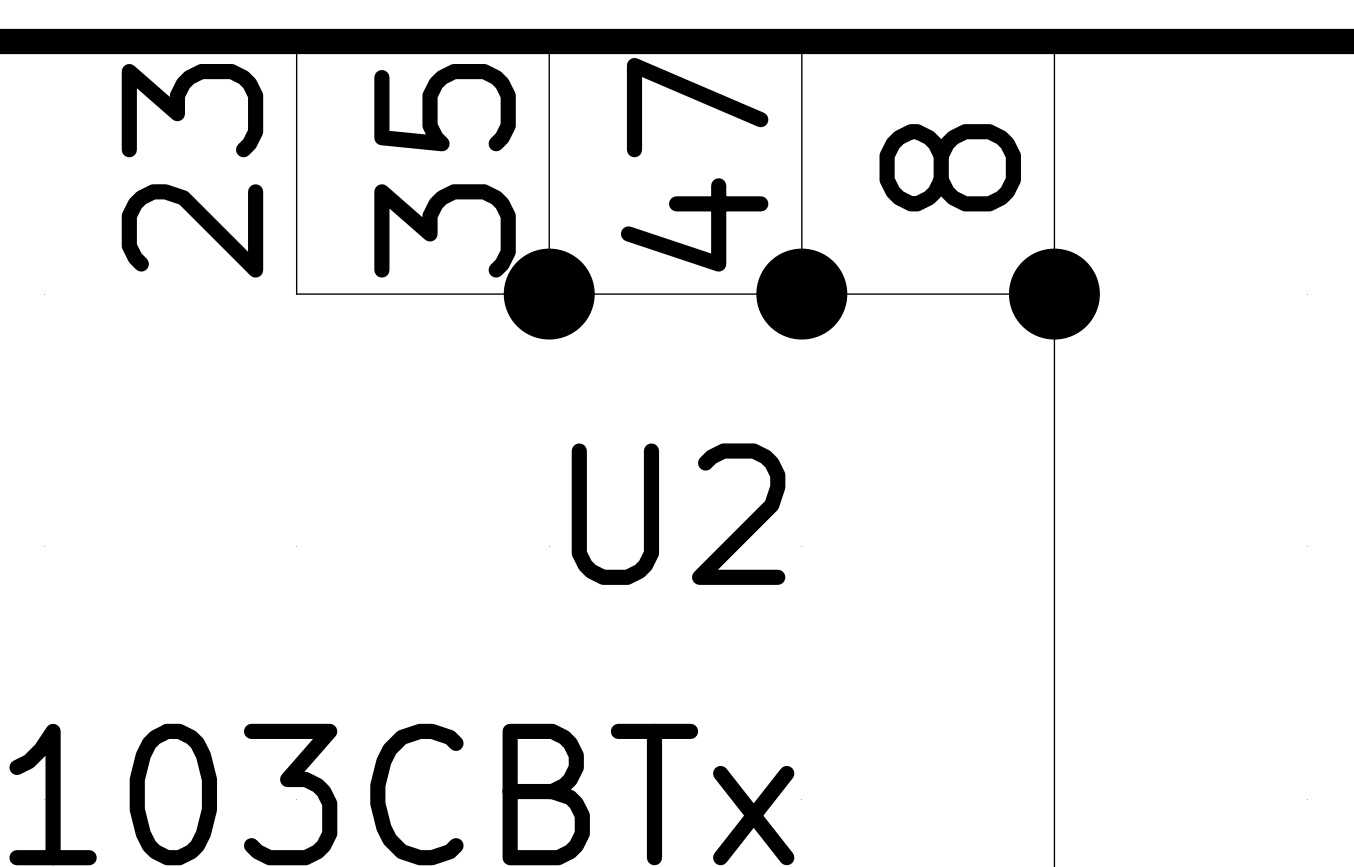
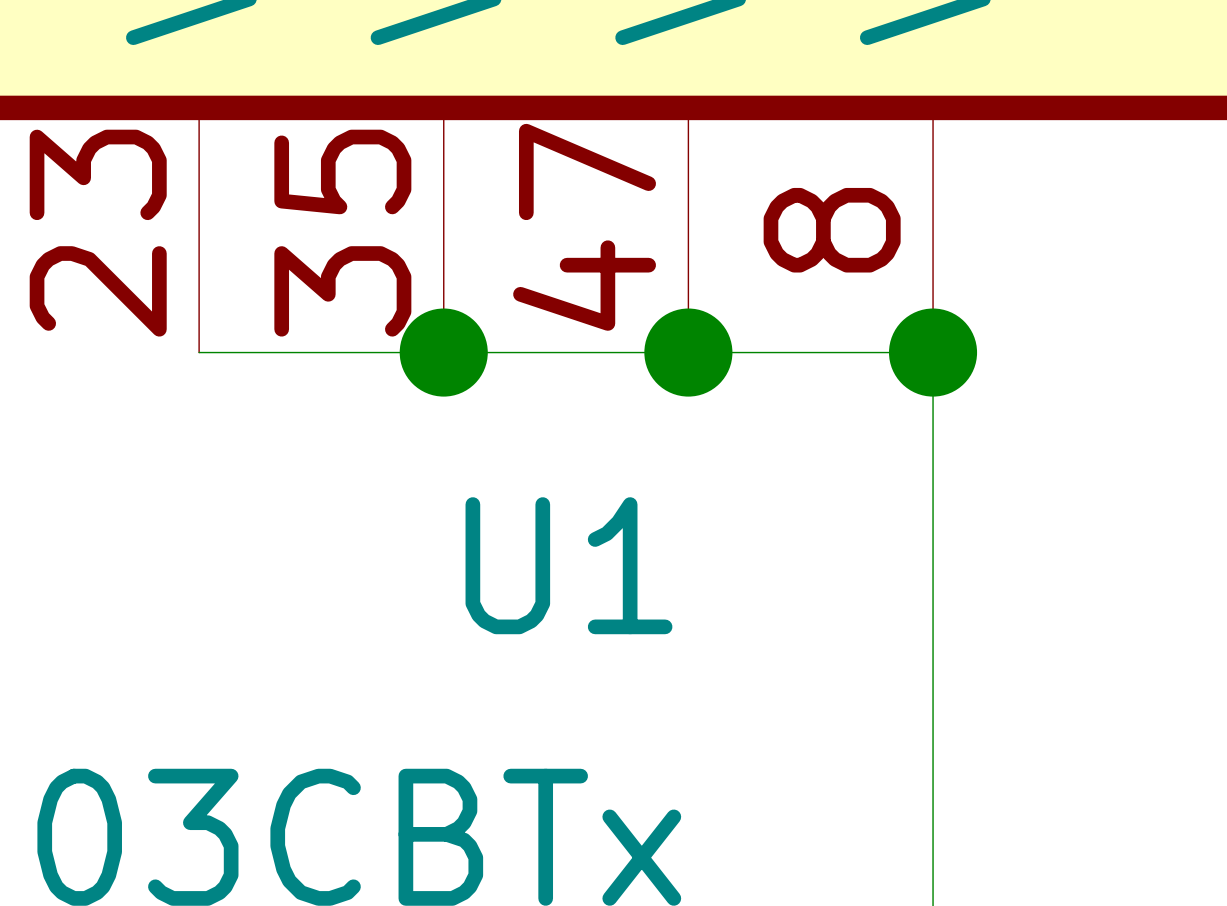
U2 name: U2 (678, 514) -> U1 (568, 565)

